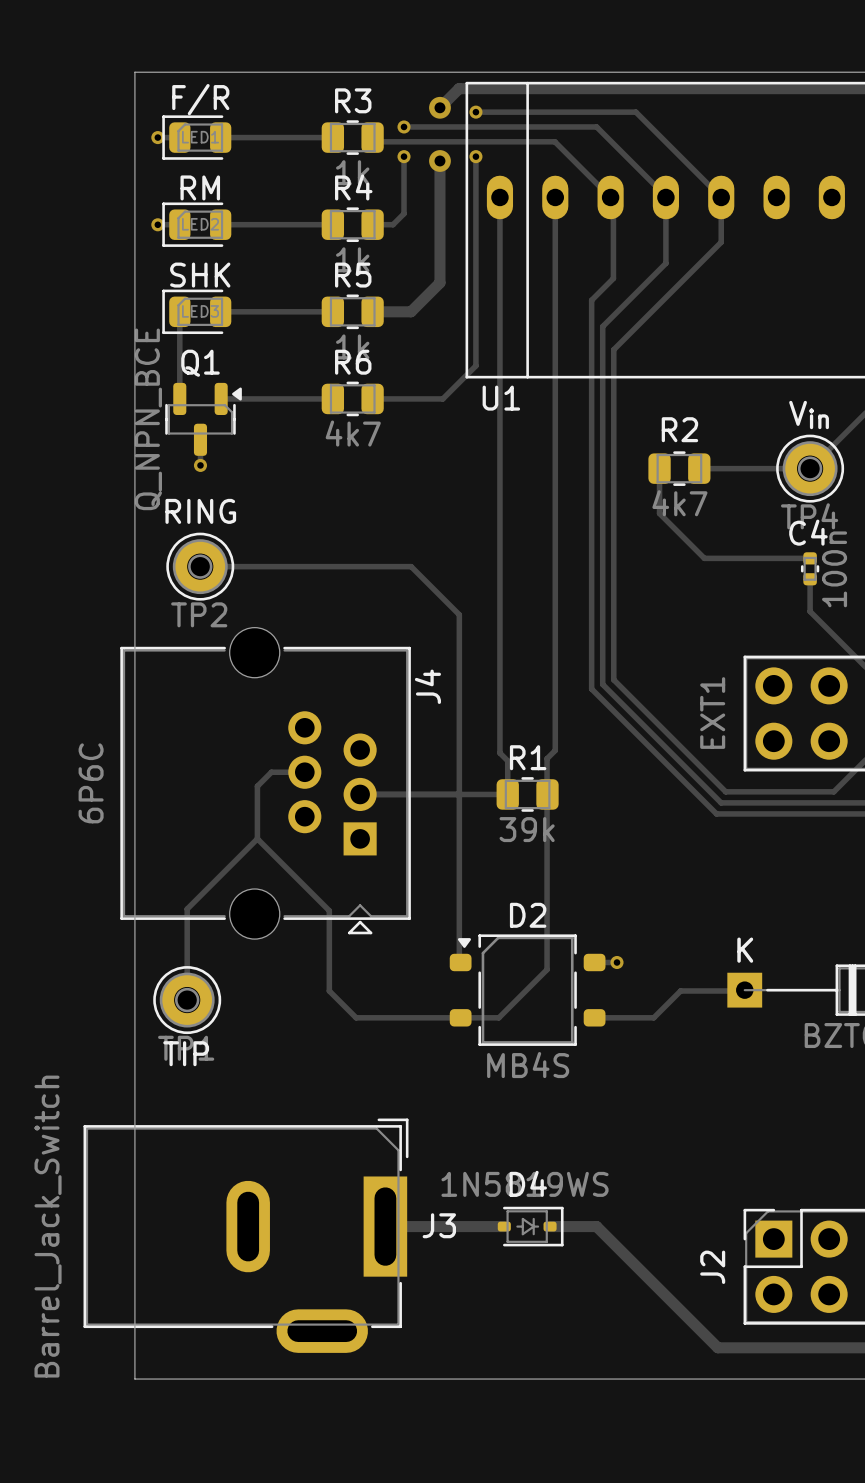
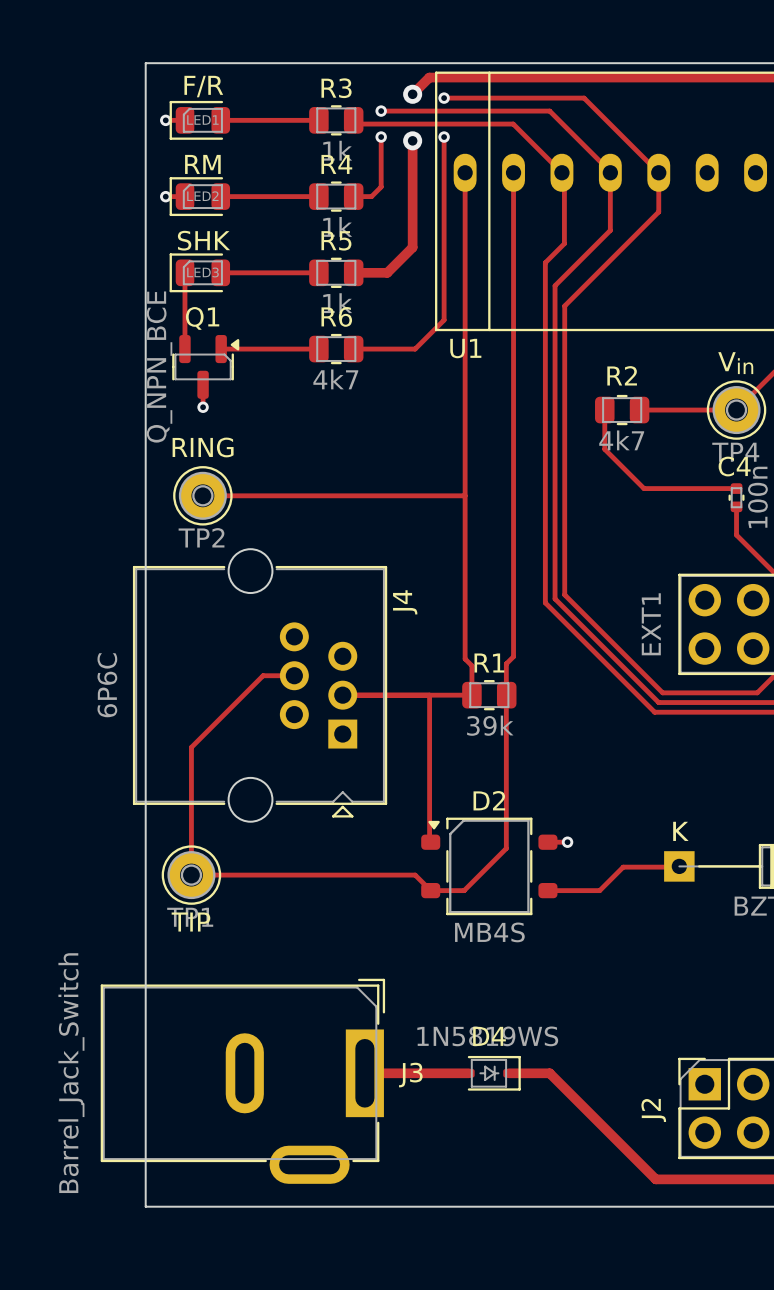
track: (411, 566) (459, 614) (459, 794) -> (387, 495) (465, 495)
track: (271, 772) (257, 786) (257, 838) -> none
track: (257, 838) (187, 909) -> (265, 675) (191, 747) (191, 795)
track: (257, 838) (329, 910) (329, 990) (356, 1017) (460, 1017) -> (191, 875) (415, 875) (430, 890)

